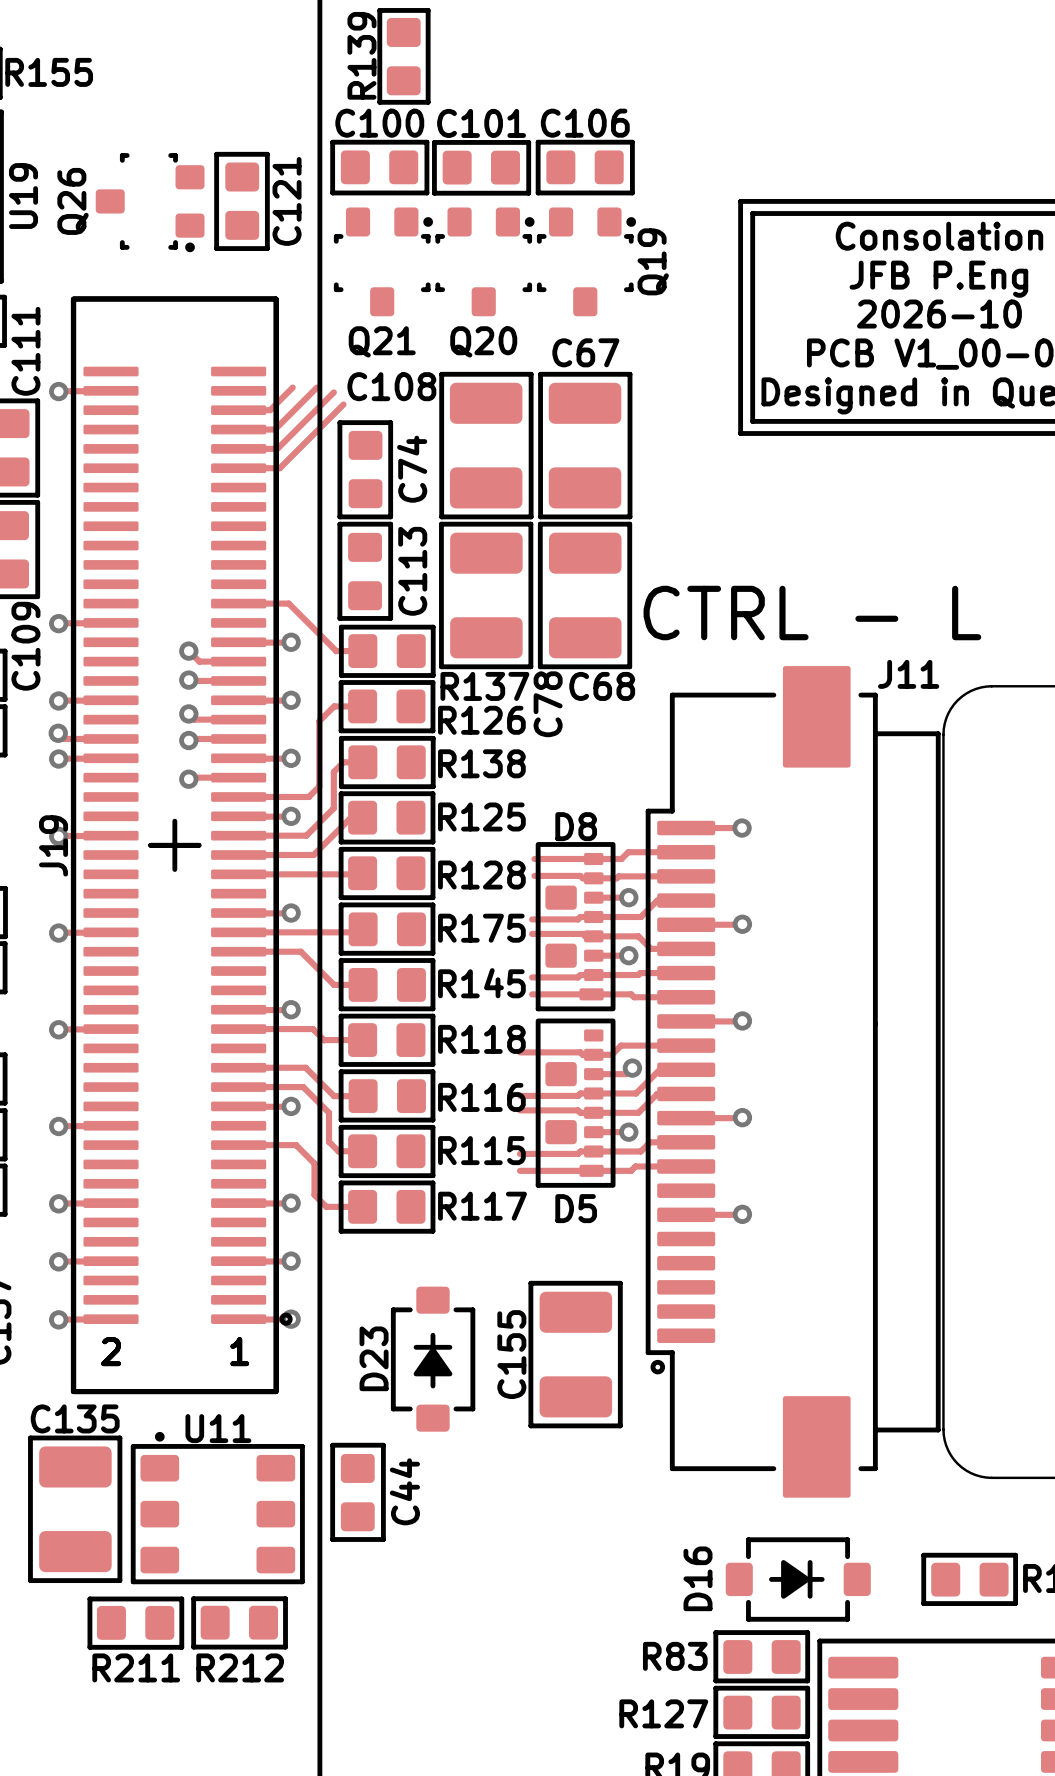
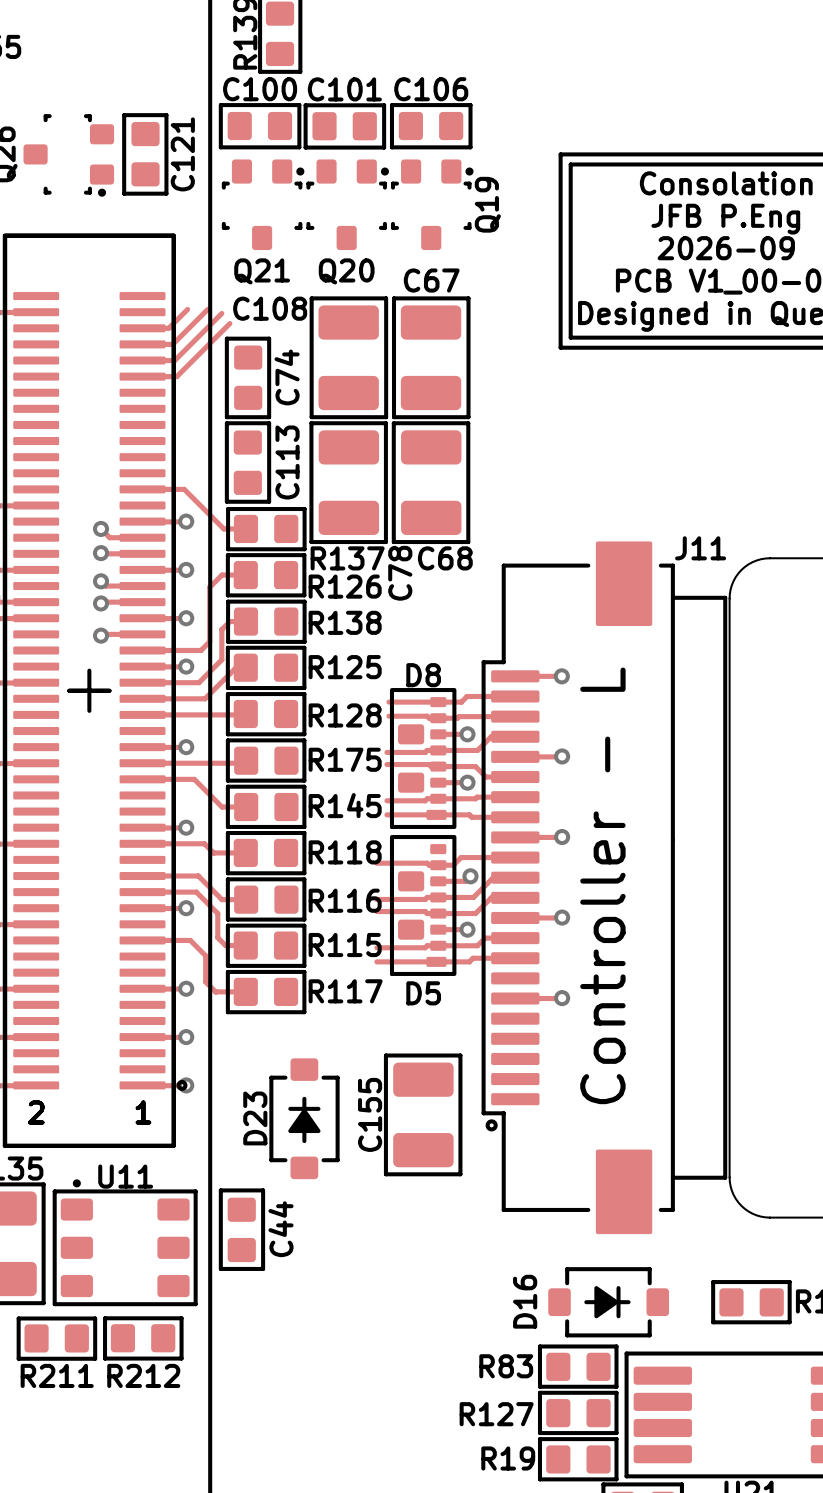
text: 2026-10 (939, 314) -> 2026-09 (726, 248)
text: CTRL - L (812, 613) -> none
text: none -> Controller - L (602, 885)

